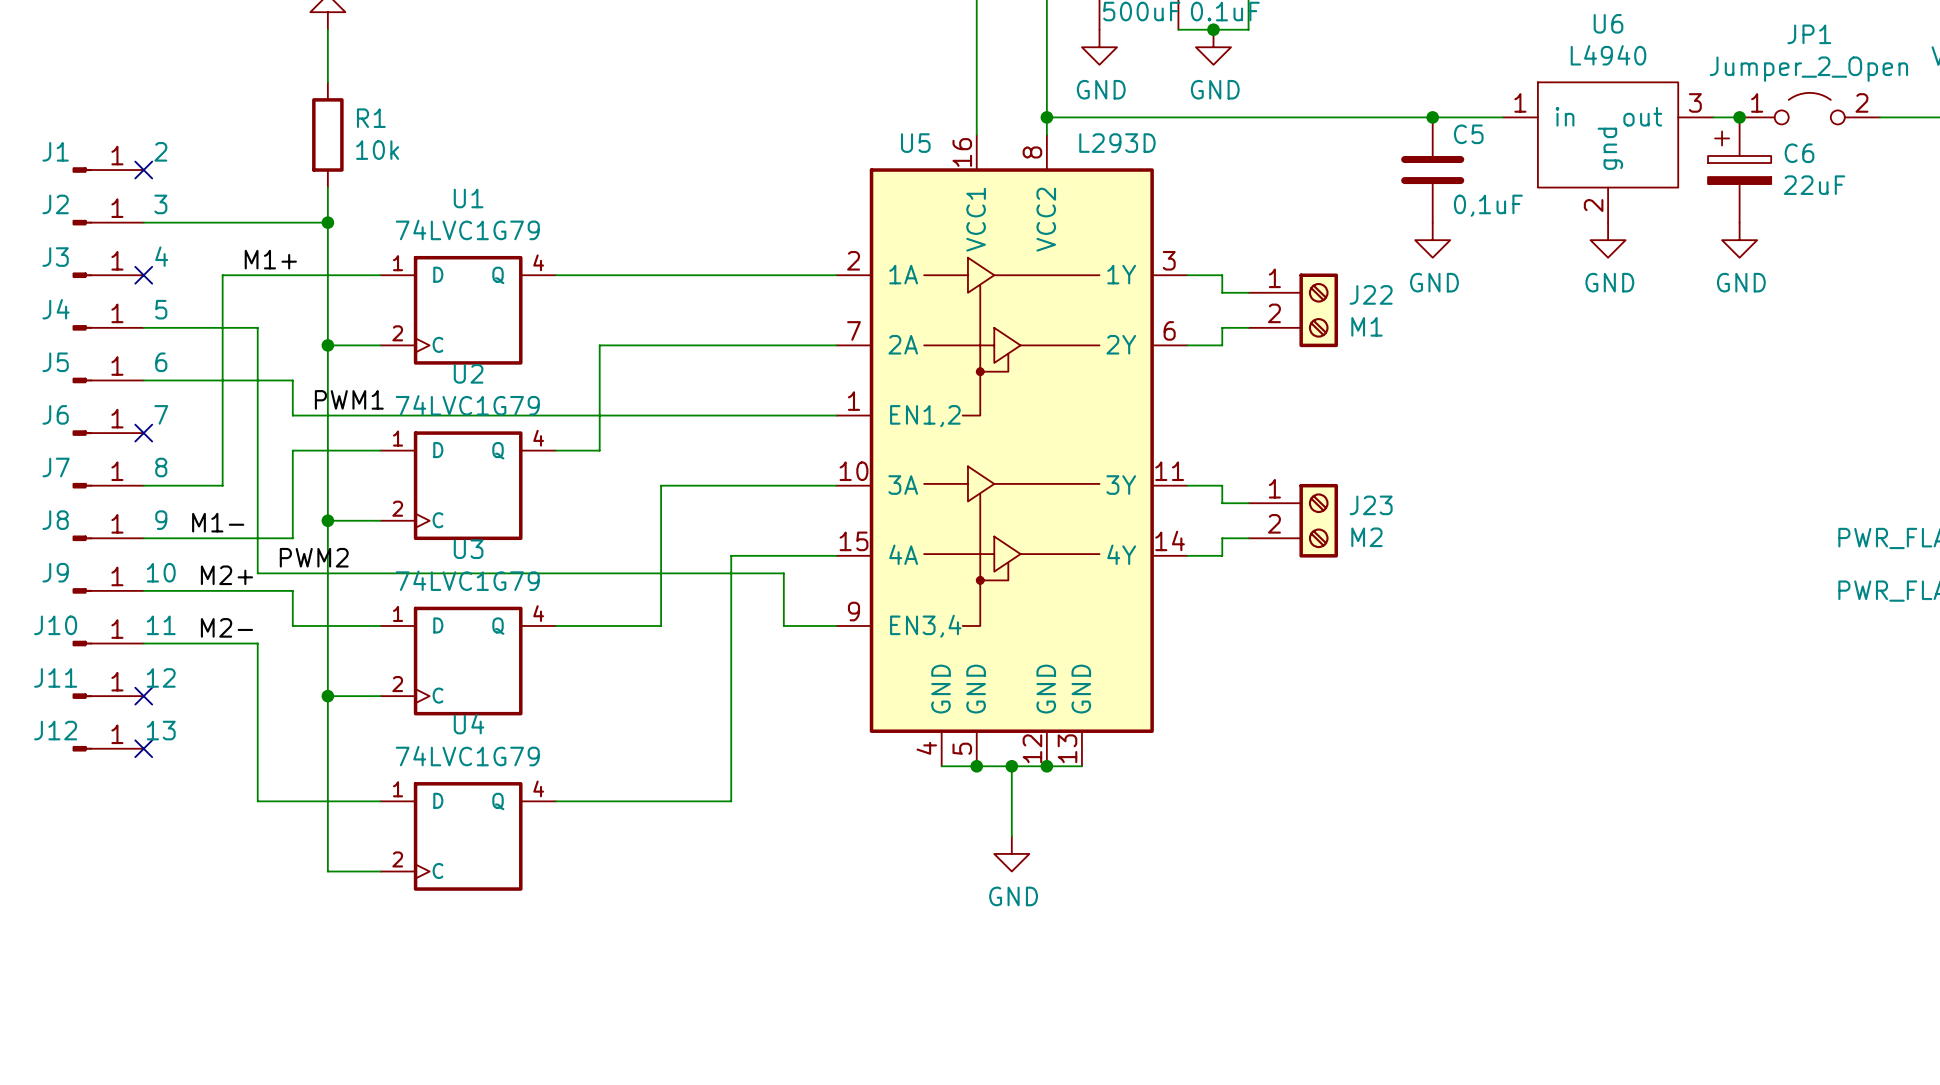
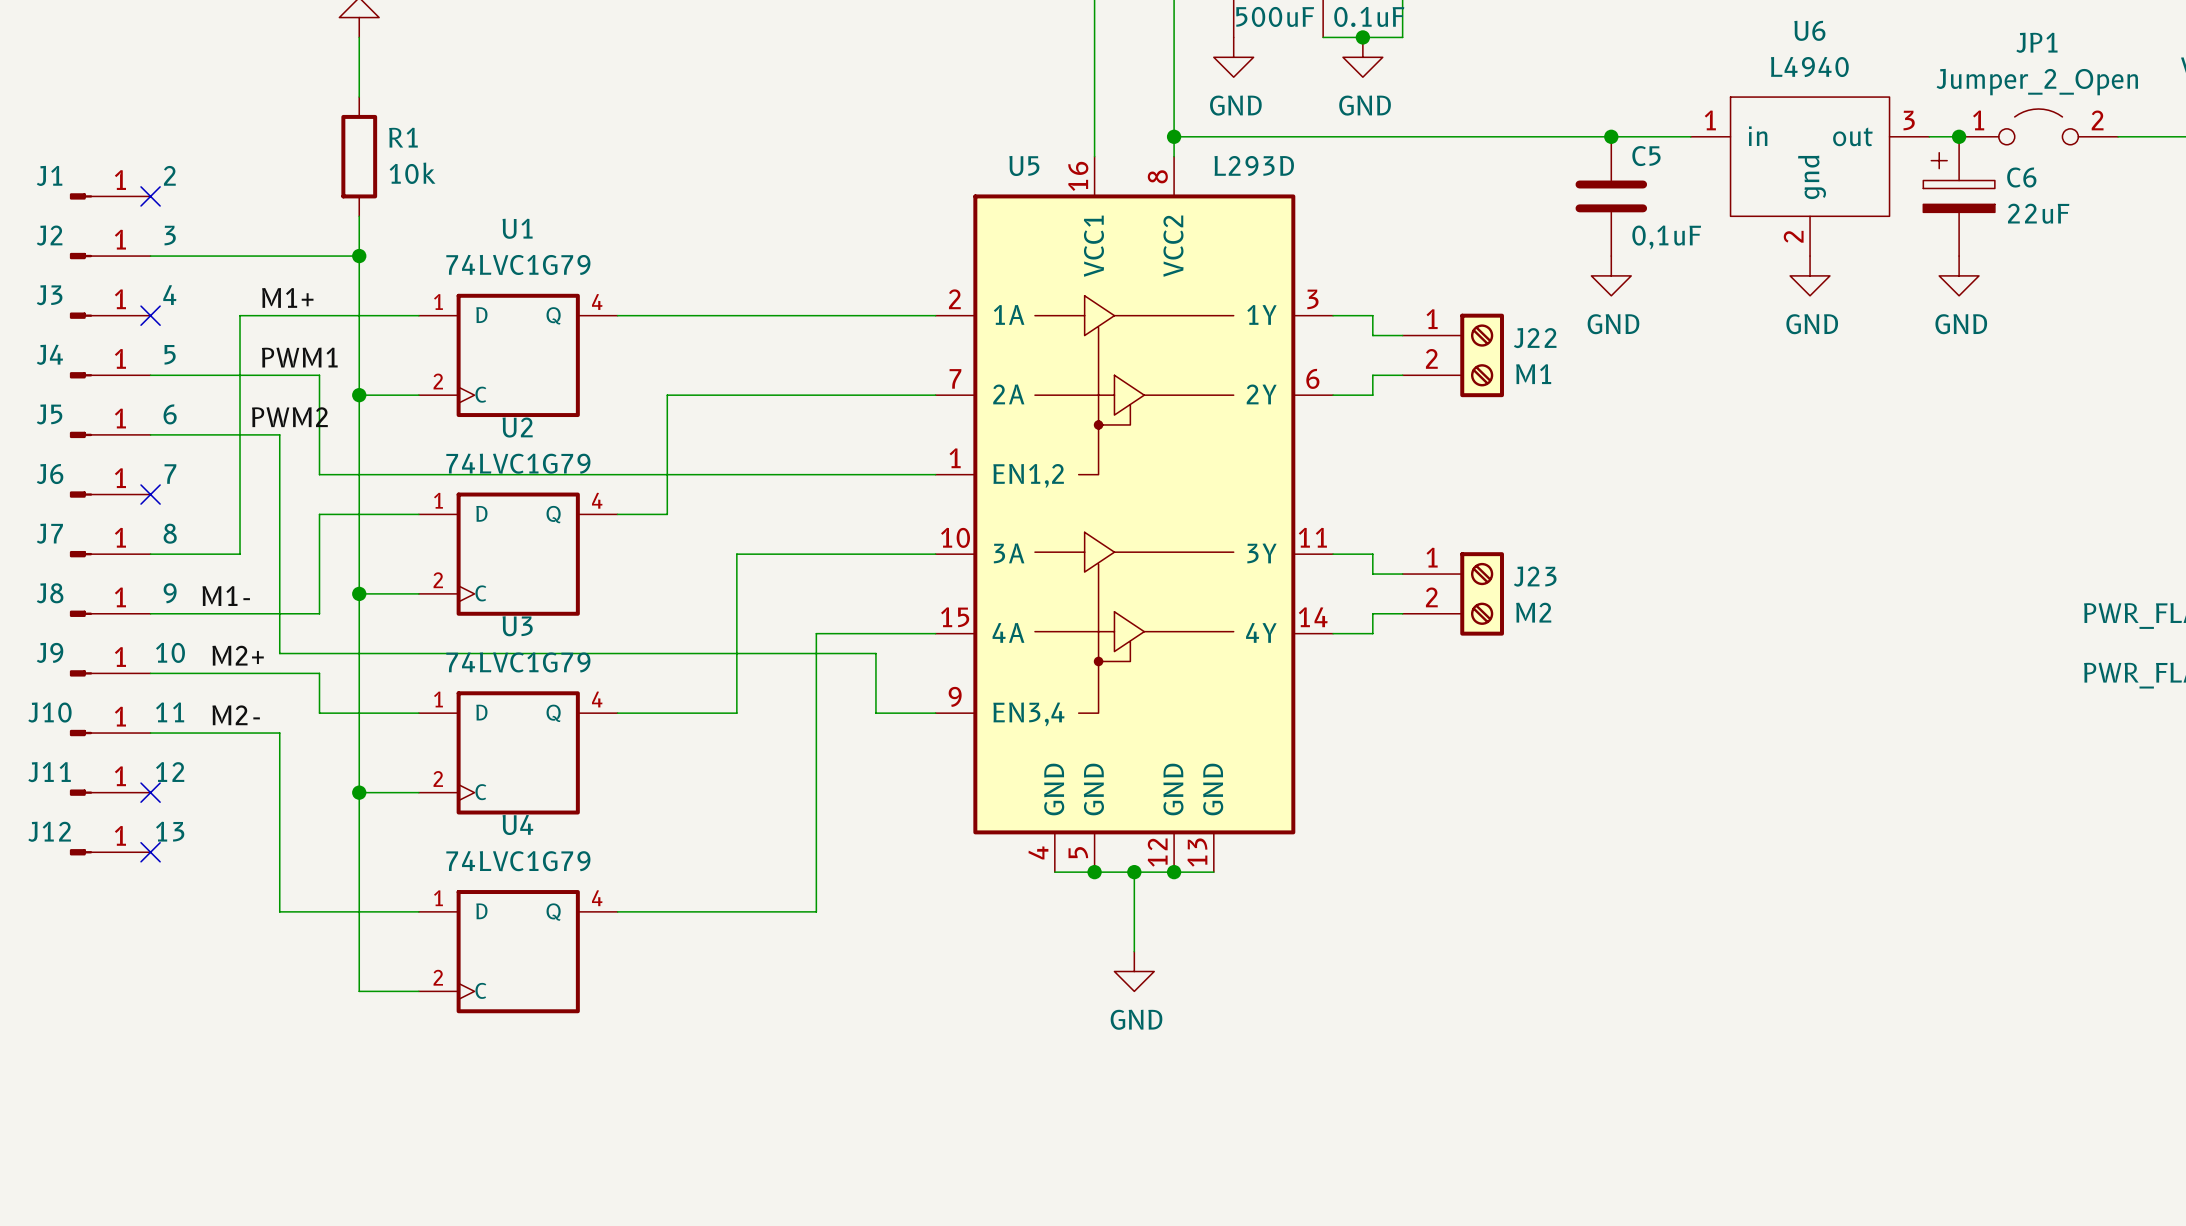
wire: (257, 327) (257, 380) (292, 380) -> (279, 375) (319, 375) (319, 434)
label position: PWM1 (349, 399) -> PWM1 (299, 357)
label position: PWM2 (314, 557) -> PWM2 (289, 417)

